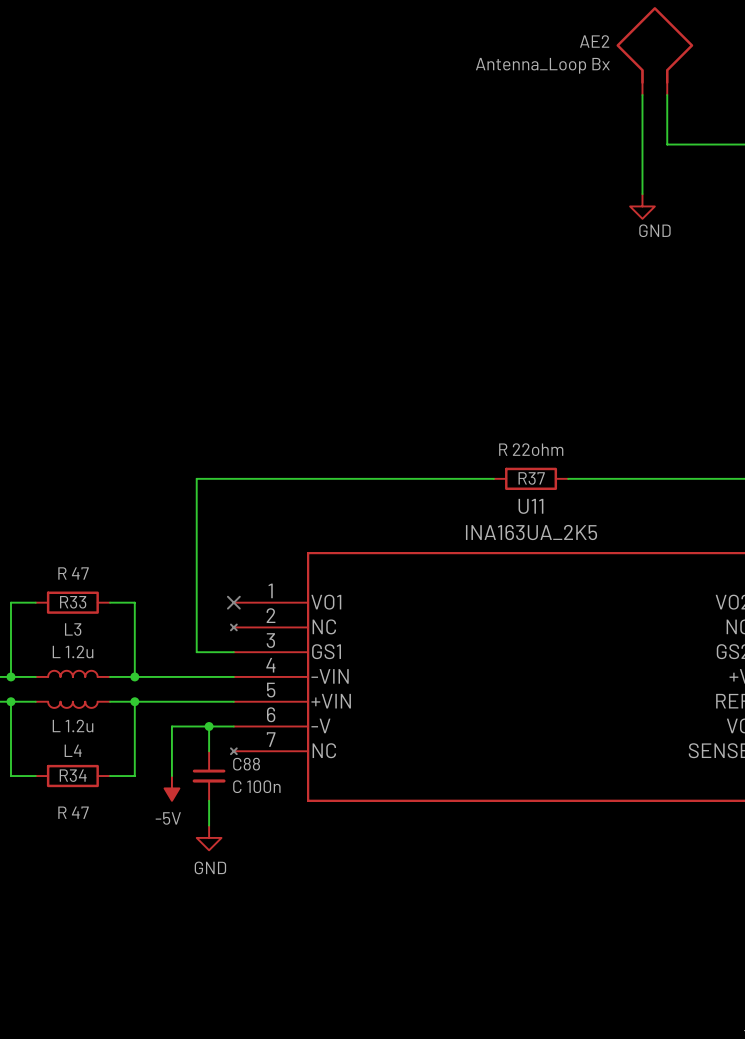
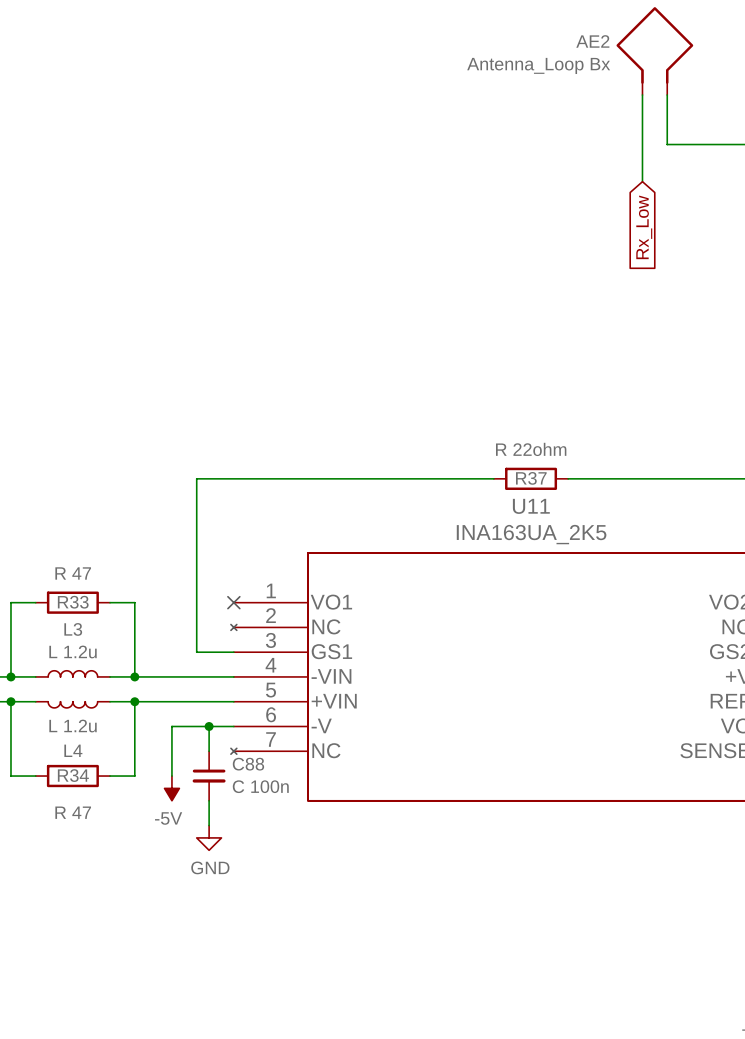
wire: (642, 181) (642, 194) -> none
power symbol: GND (642, 206) -> none
global label: none -> Rx_Low (644, 227)

